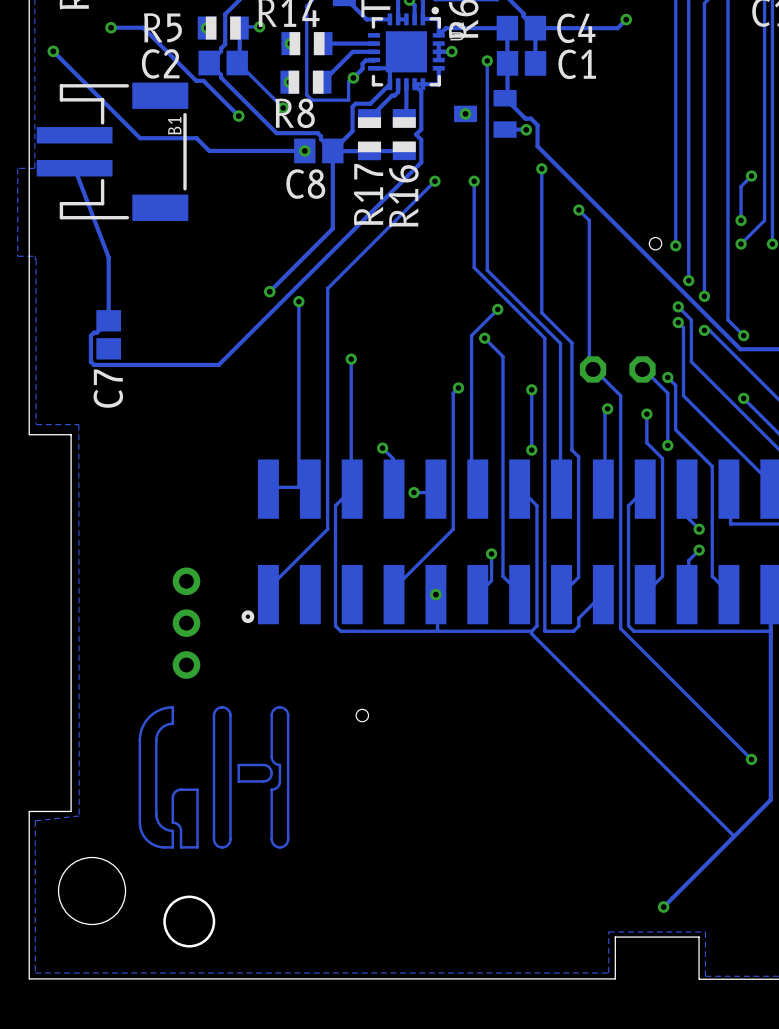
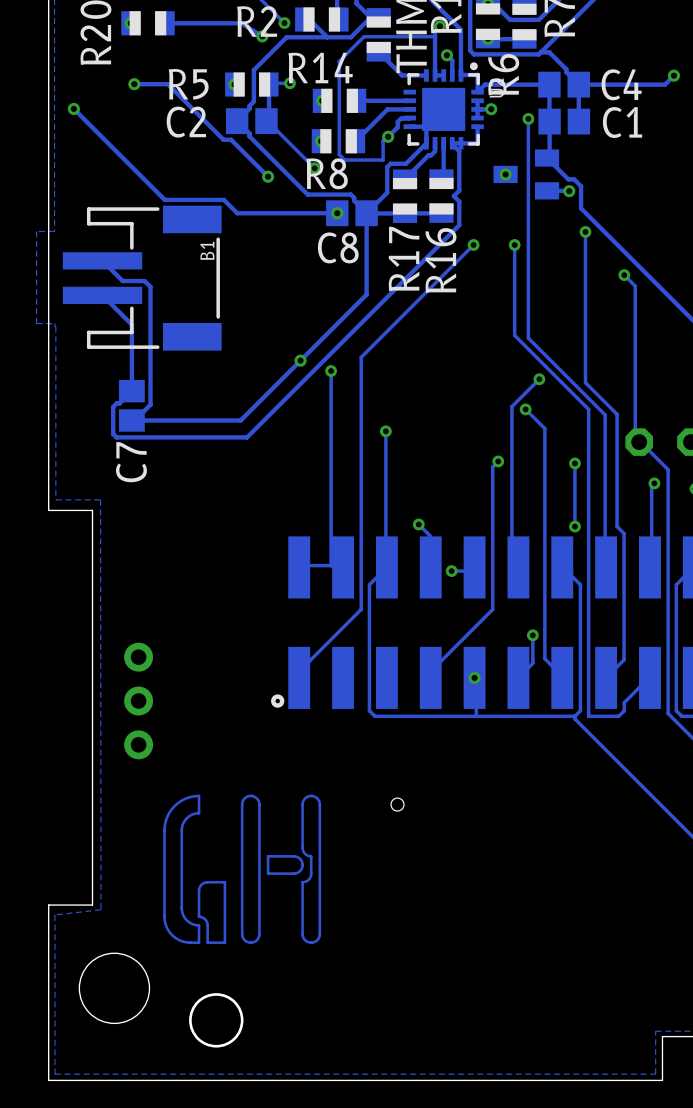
B1 position: (112, 151) -> (142, 278)
track: (74, 168) (108, 257) -> (102, 295) (131, 324)
track: none -> (102, 260) (122, 281) (144, 281) (150, 286) (150, 404) (140, 414) (140, 420)
track: none -> (300, 360) (240, 420) (131, 420)
part position: (186, 623) -> (138, 701)

